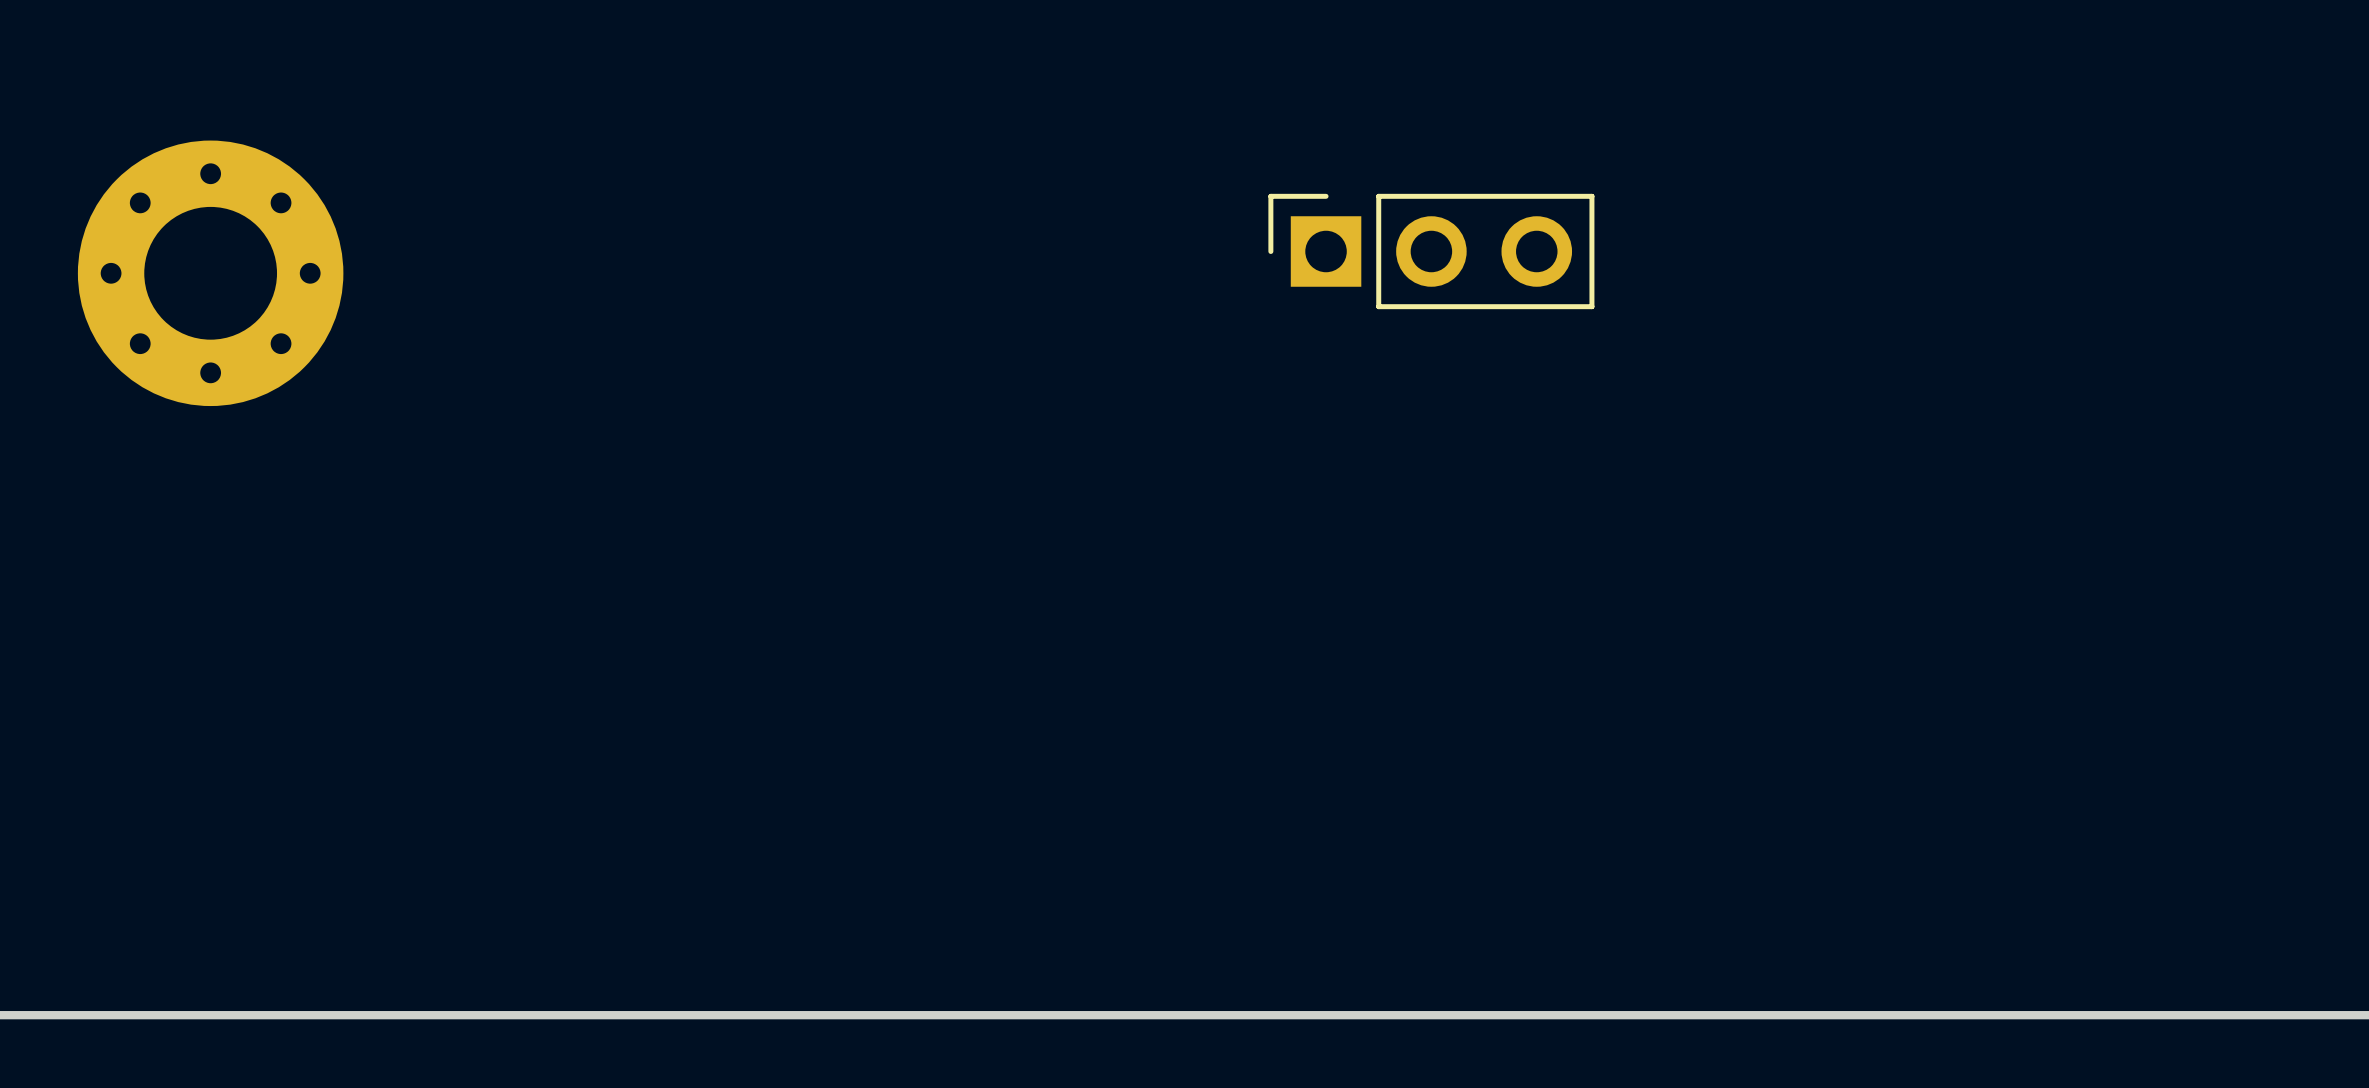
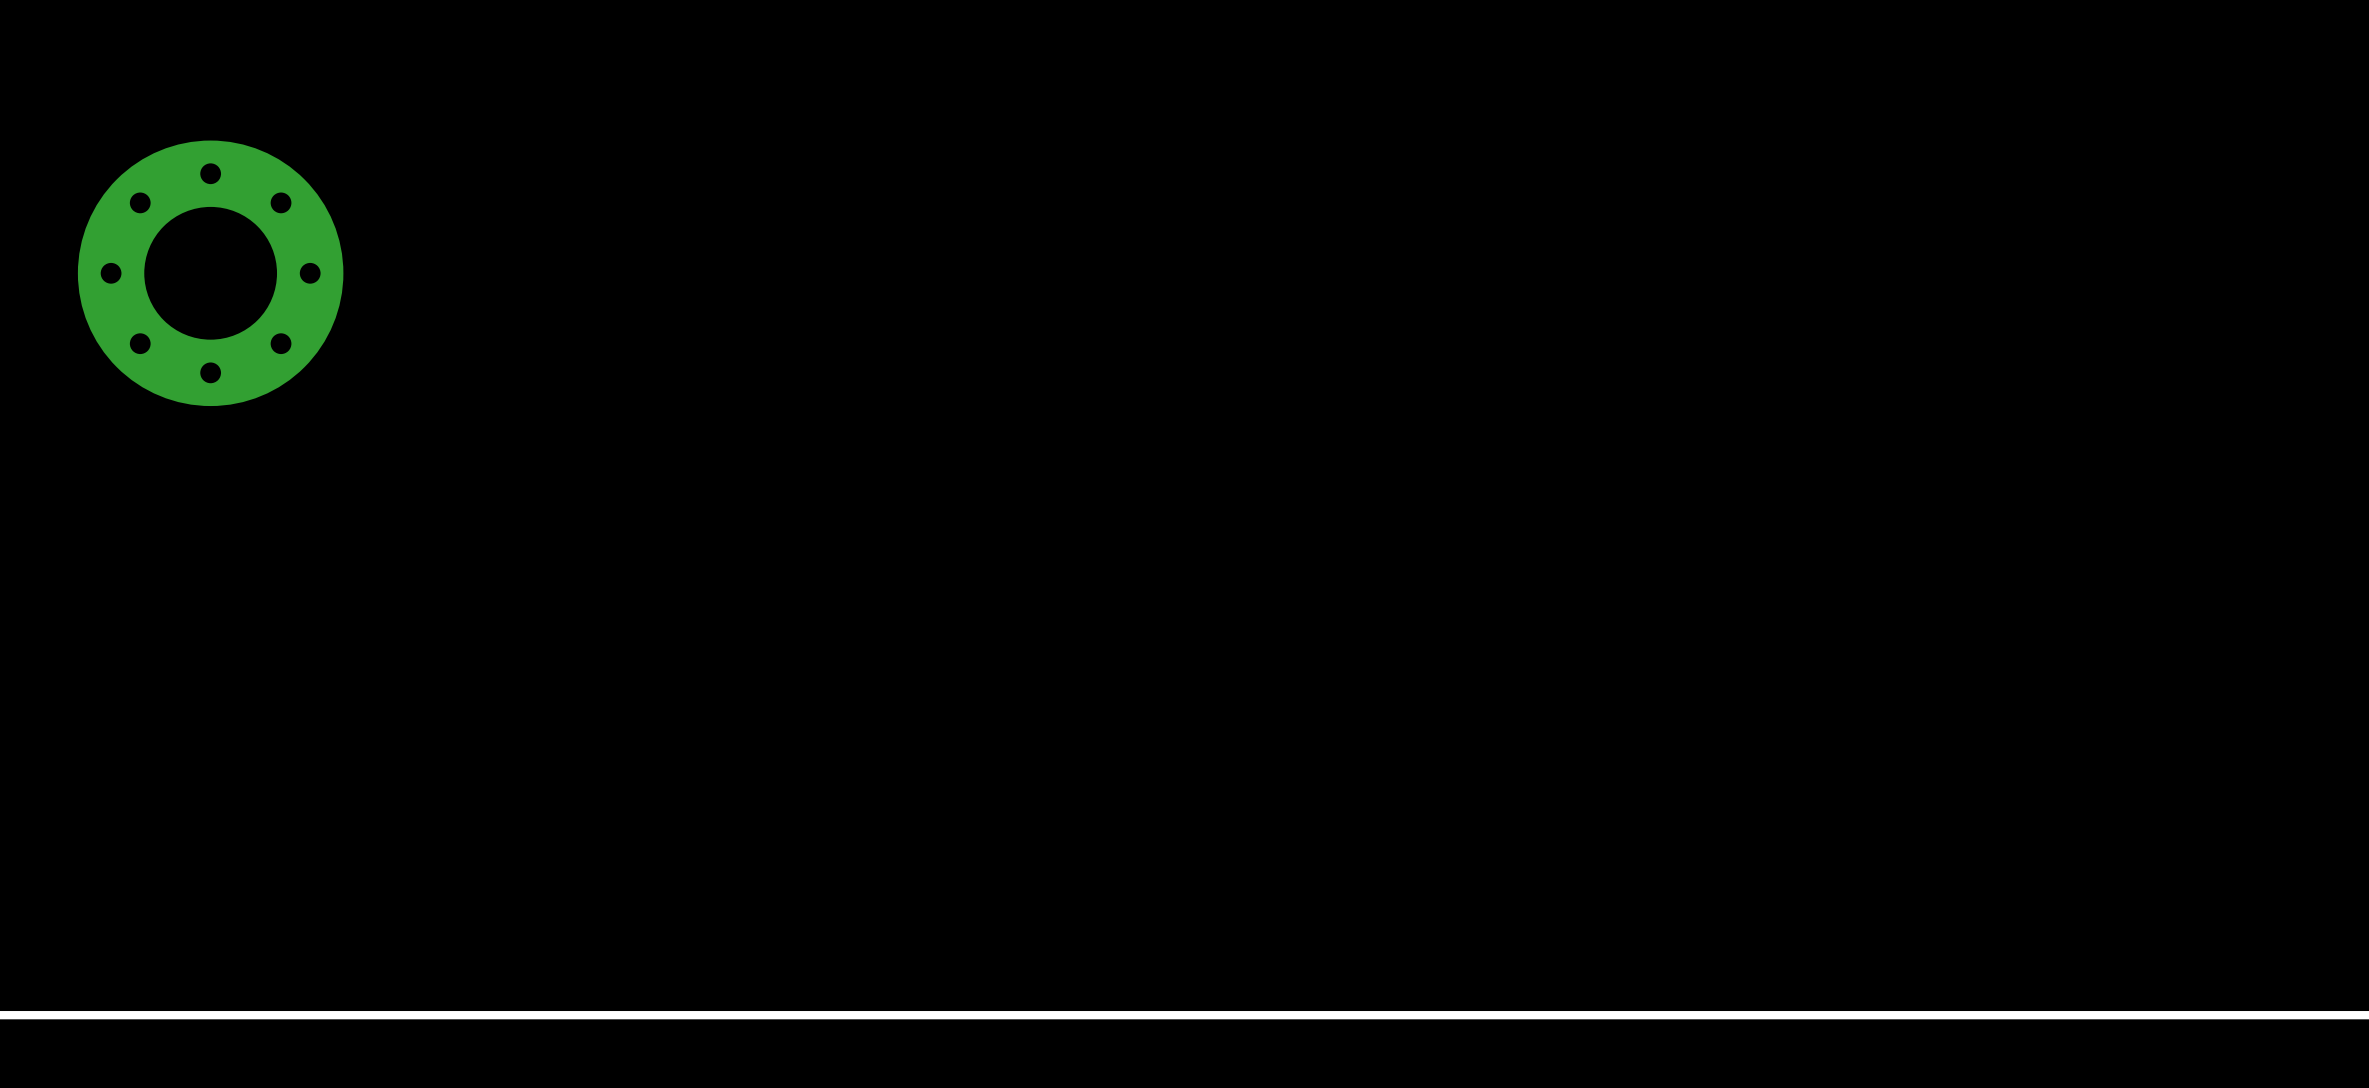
part: (1431, 251) -> none

